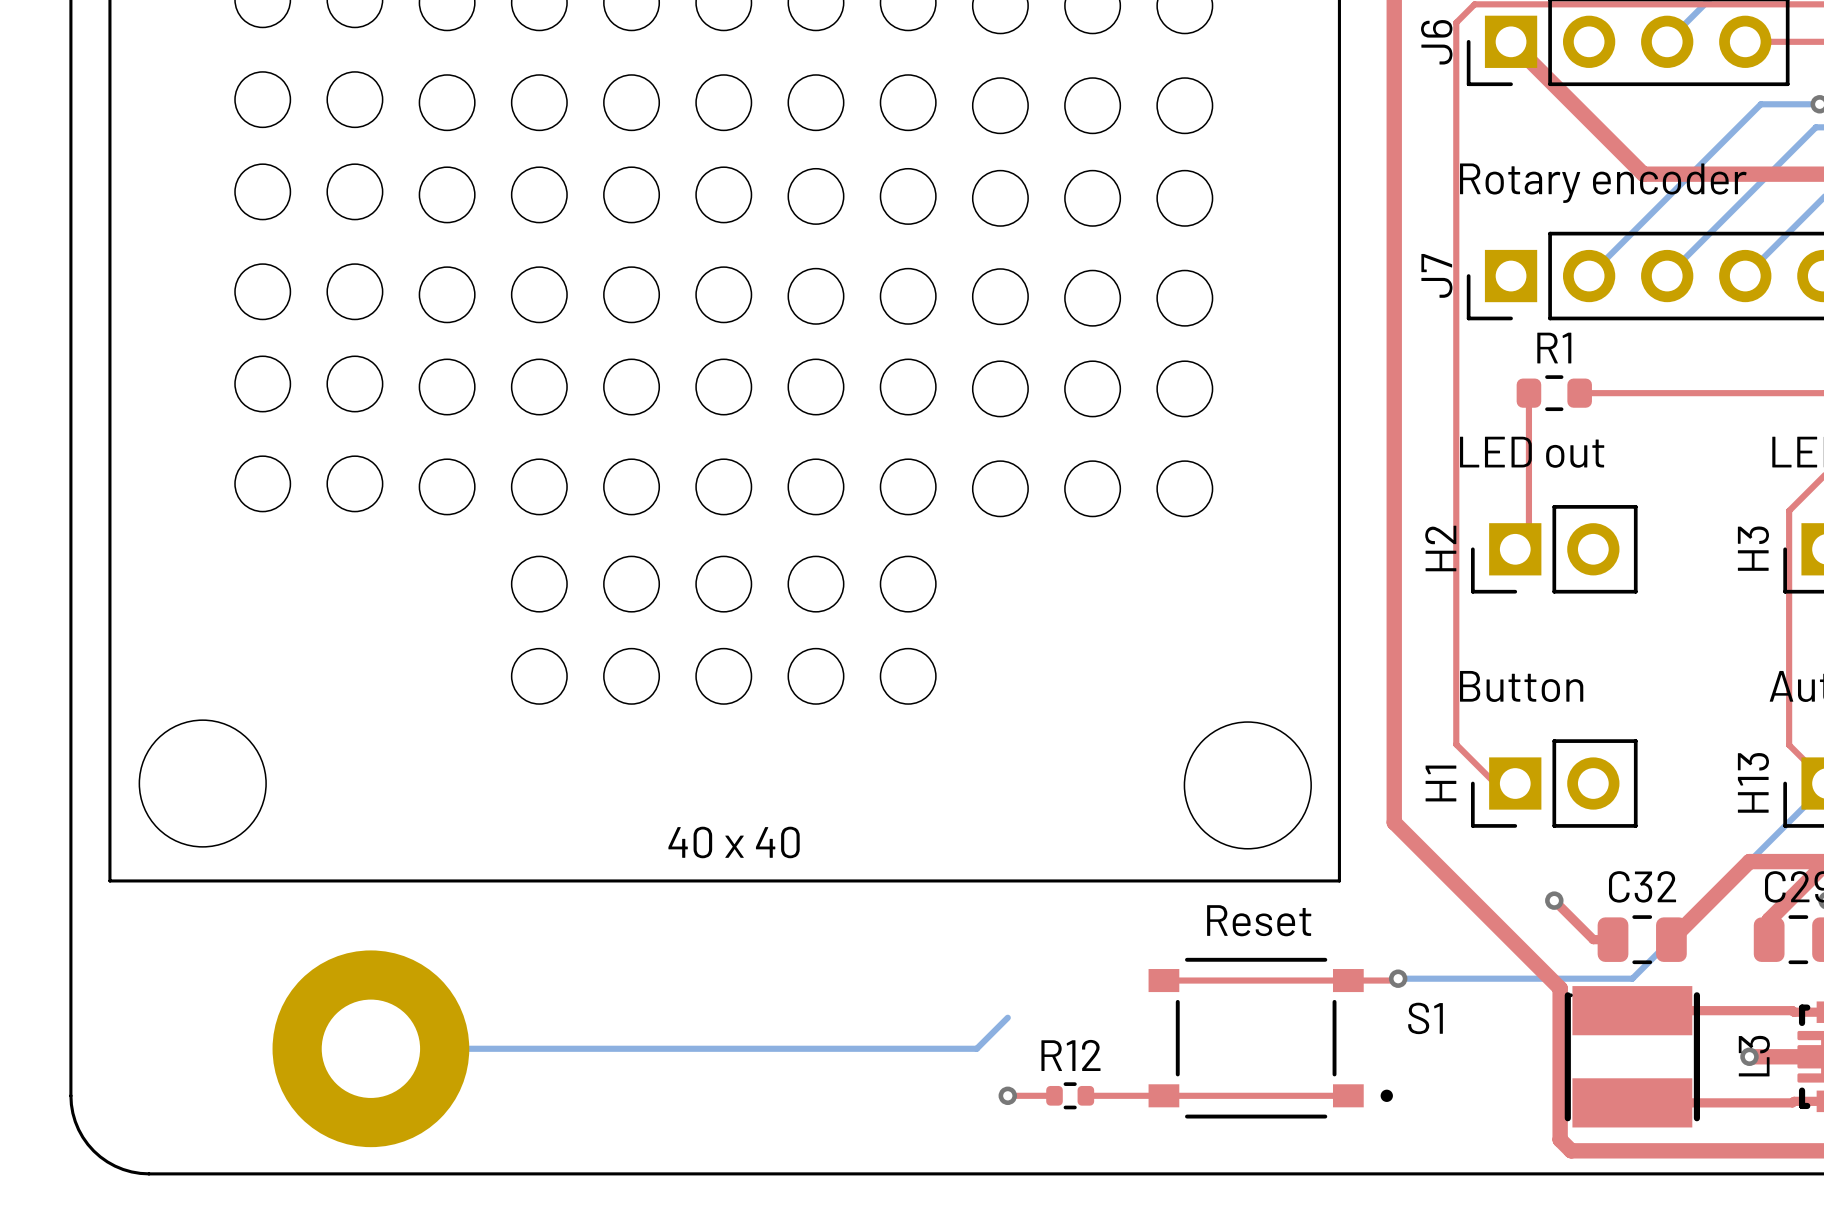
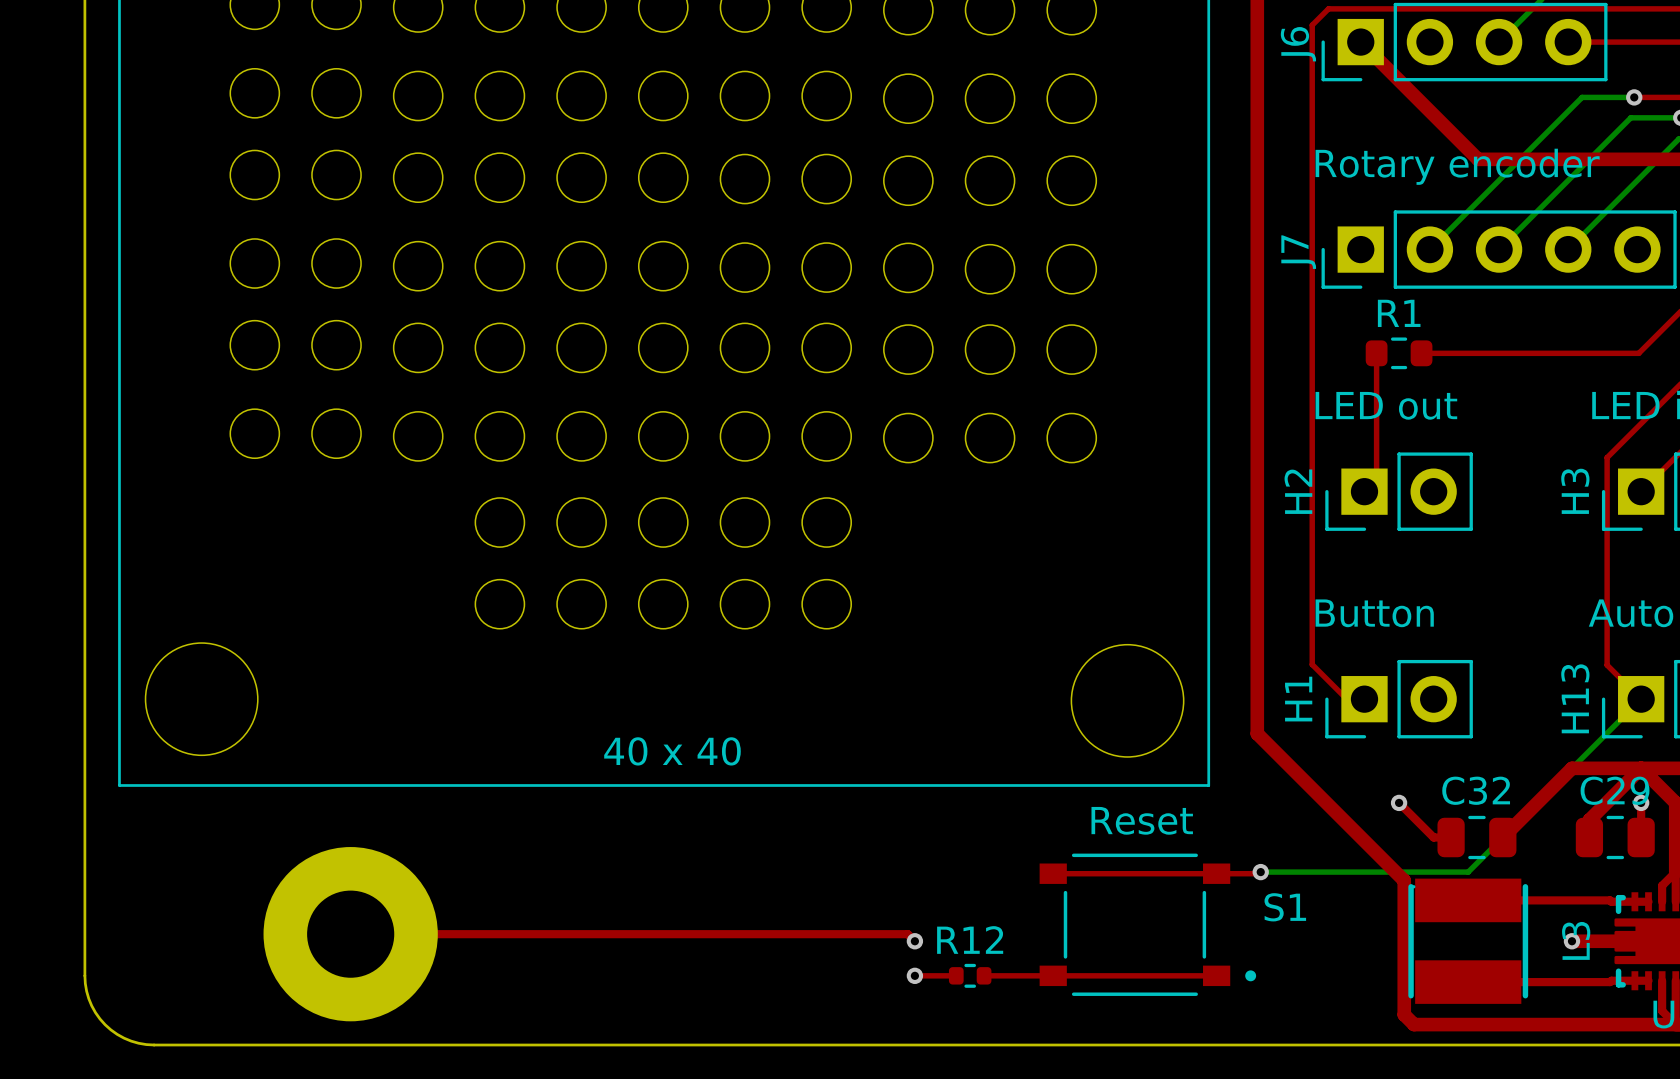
bottom track: (1007, 1017) (976, 1048) (370, 1048) -> none
top track: none -> (350, 934) (907, 934) (914, 941)
via: none -> (914, 941)

